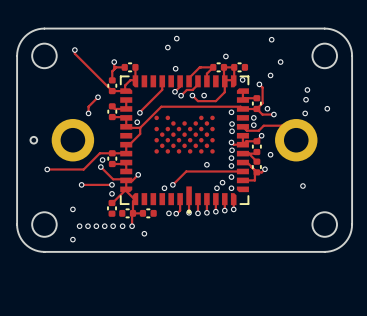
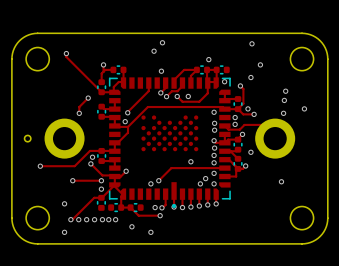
track: none -> (101, 197) (94, 197) (72, 219)
track: none -> (130, 207) (138, 215) (160, 215)
track: (132, 214) (132, 226) -> none
via: none -> (160, 215)
via: none -> (108, 219)
via: (122, 226) -> none
via: none -> (115, 219)
via: (132, 226) -> none
via: none -> (150, 232)

